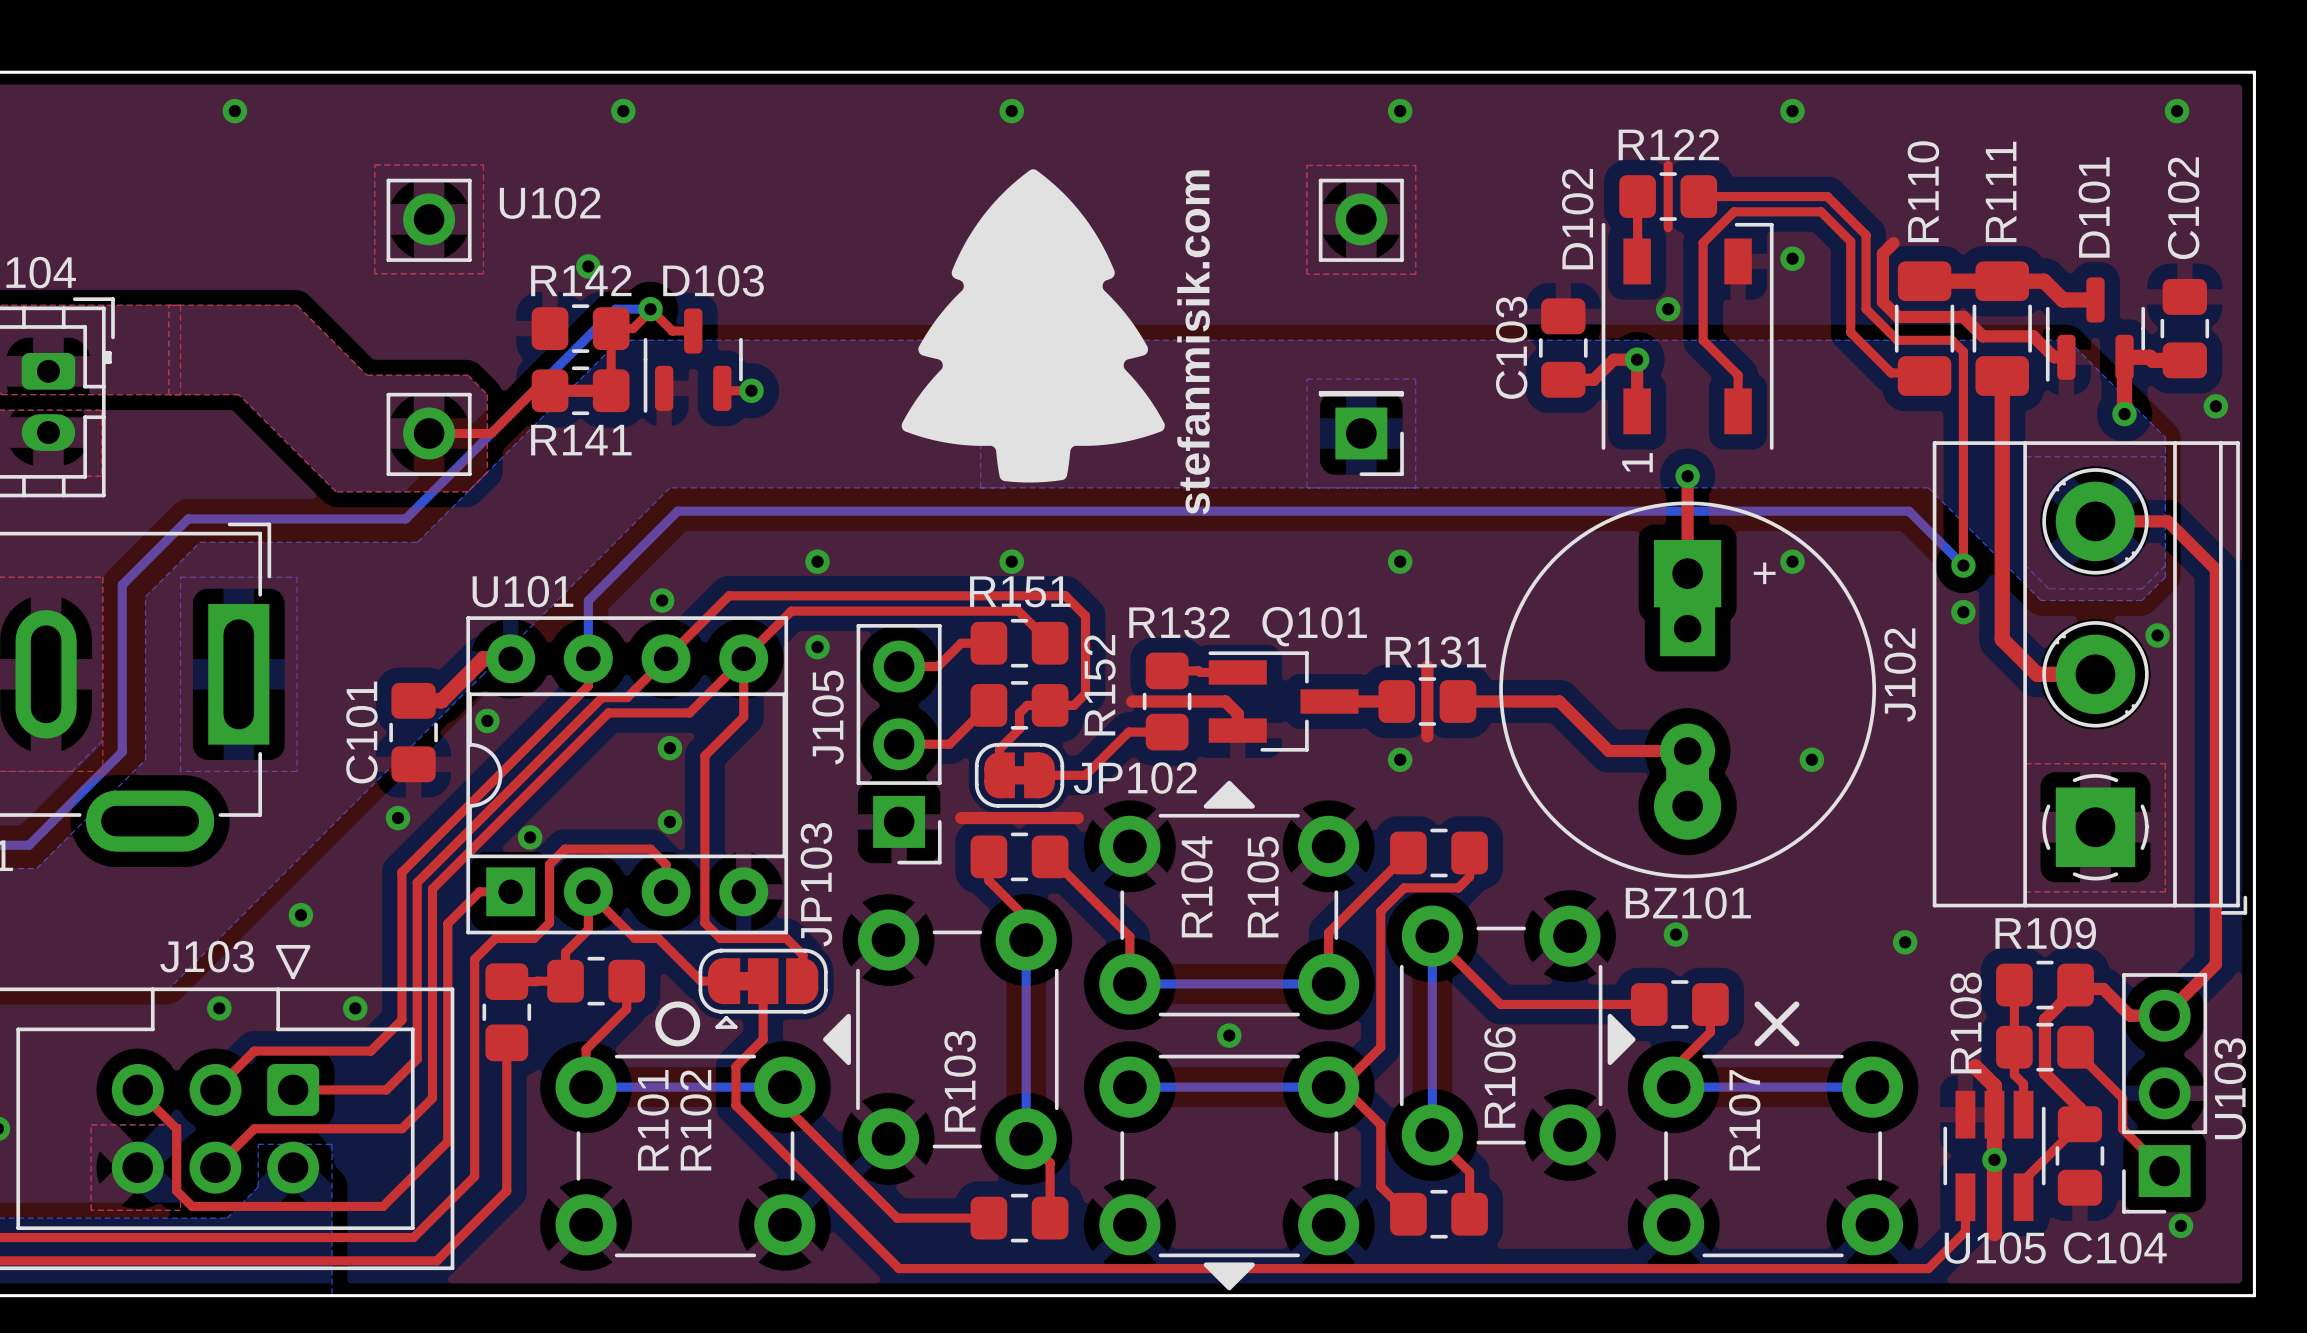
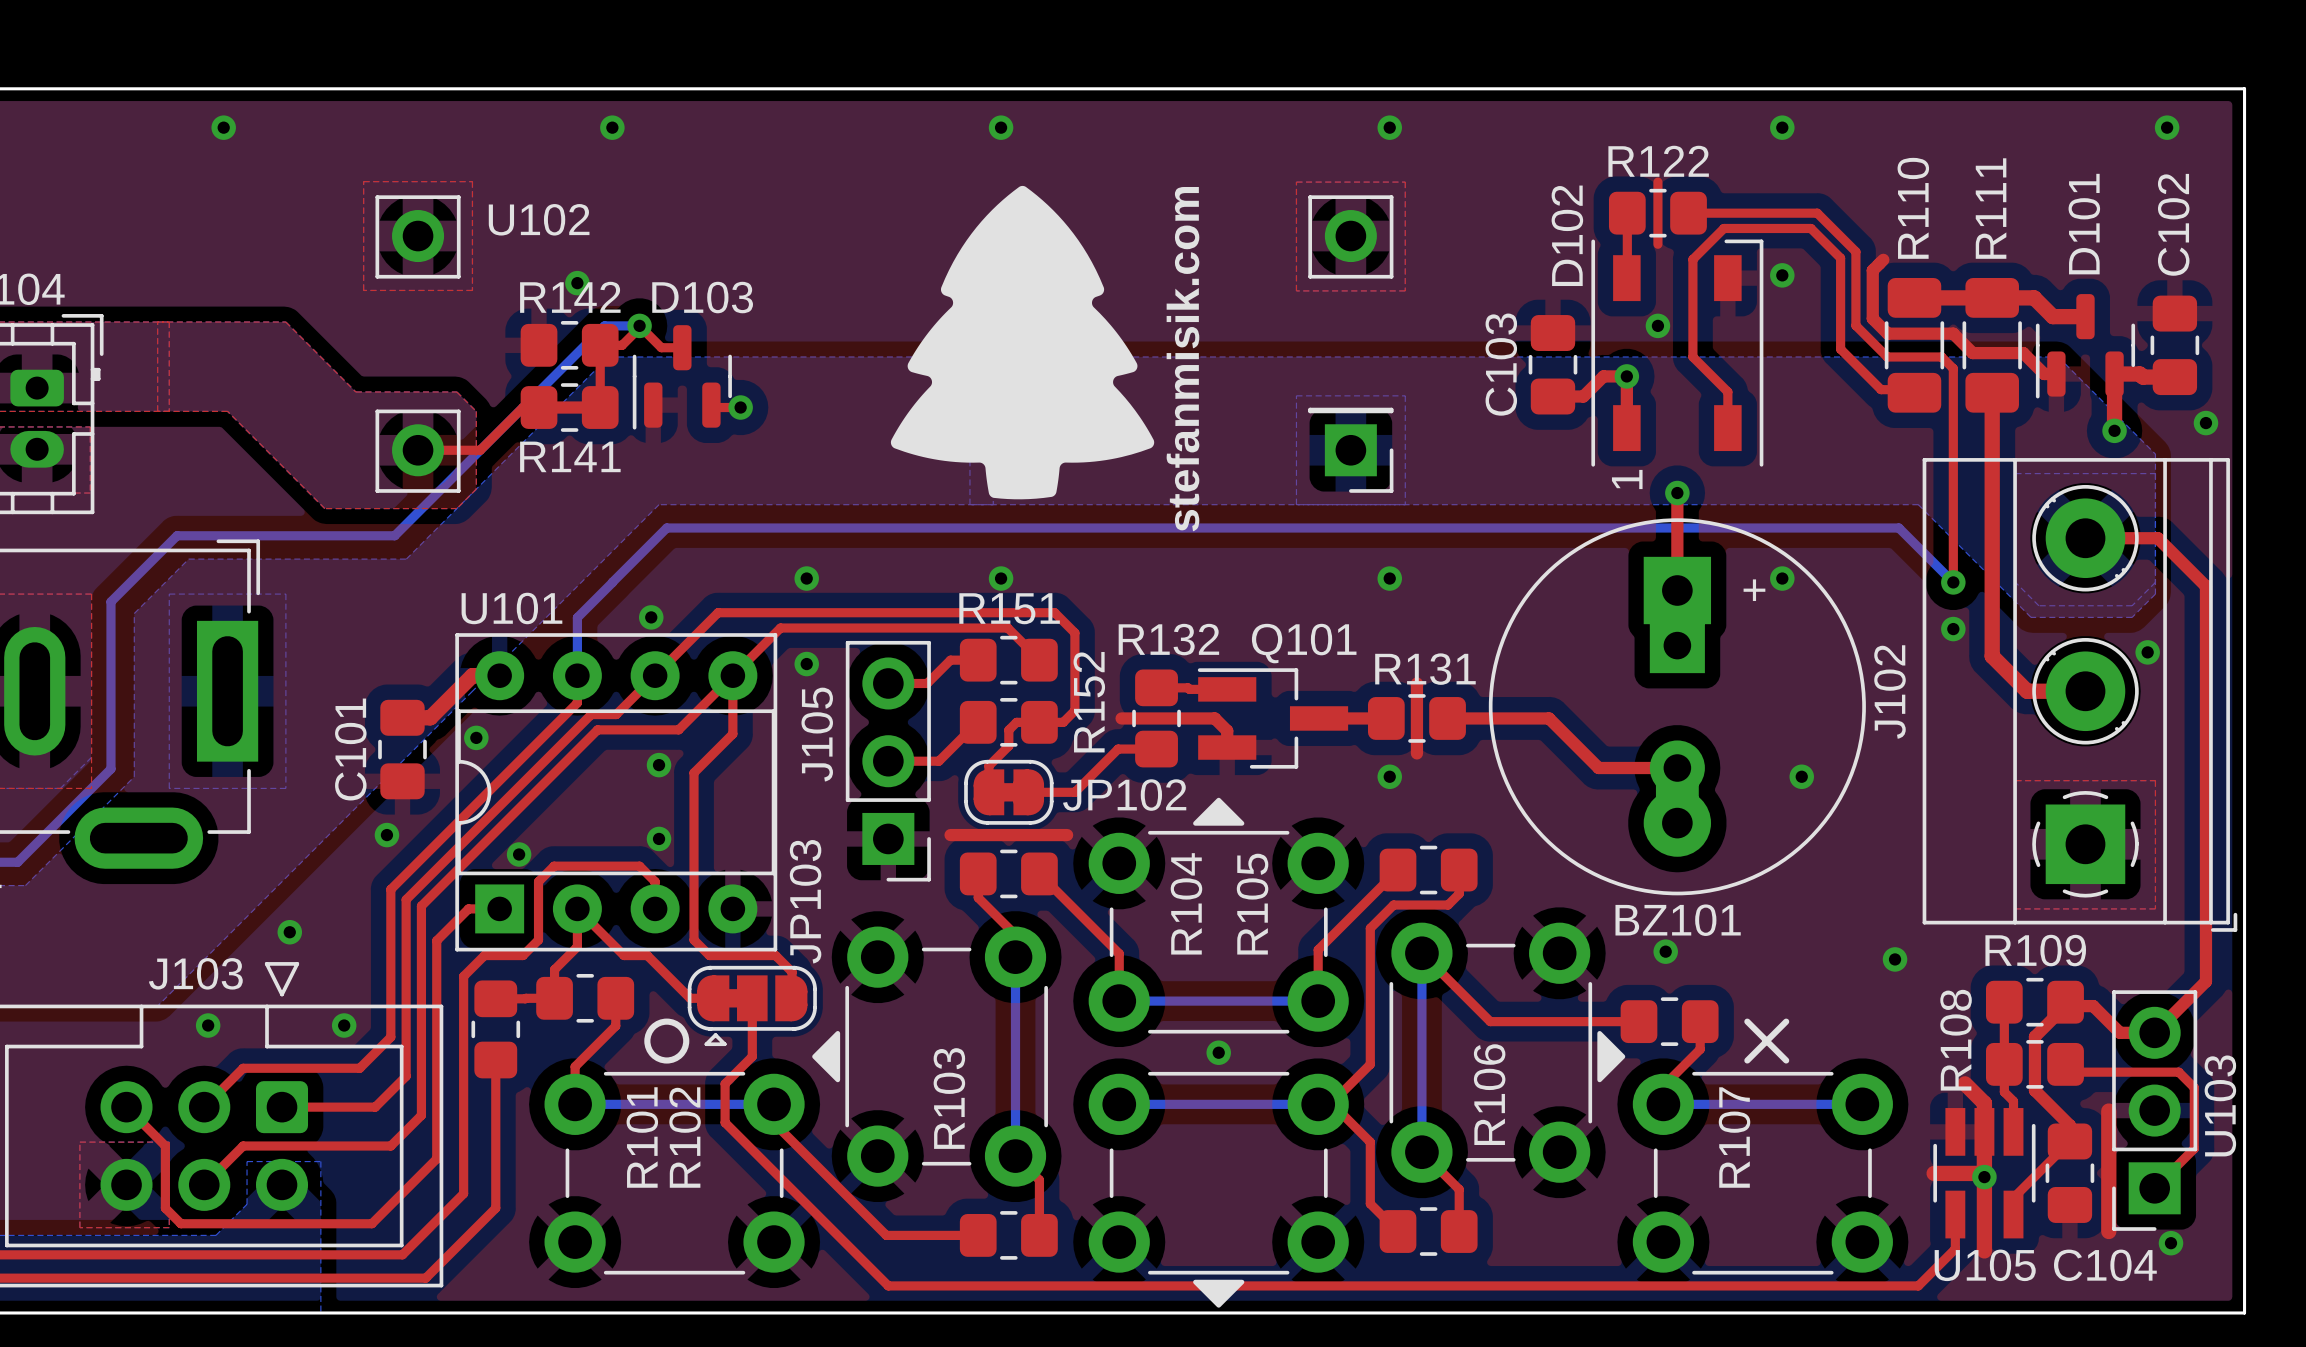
top track: (2075, 1051) (2122, 1098) (2122, 1129) (2164, 1171) -> (2065, 1064) (2073, 1072) (2178, 1072) (2194, 1087) (2194, 1148) (2154, 1188)
top track: none -> (2108, 1111) (2108, 1231)
top track: none -> (1934, 1173) (1984, 1173)

